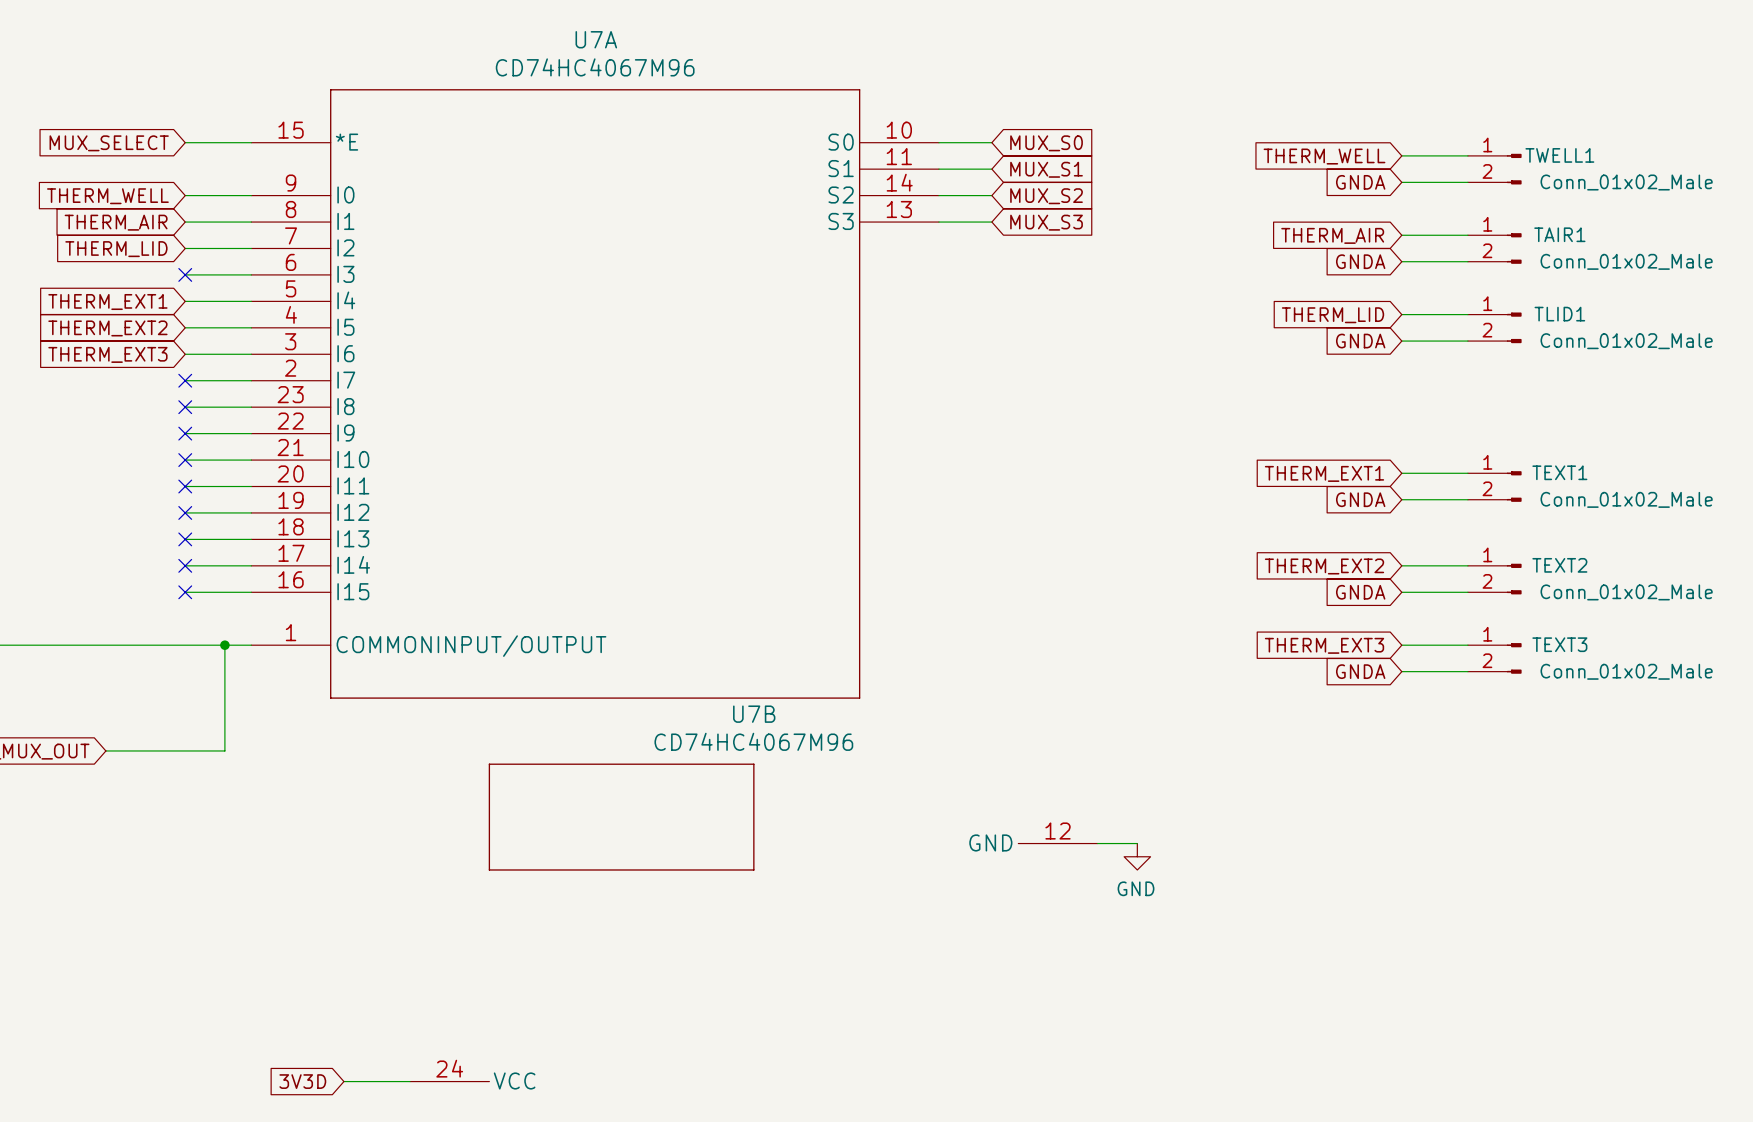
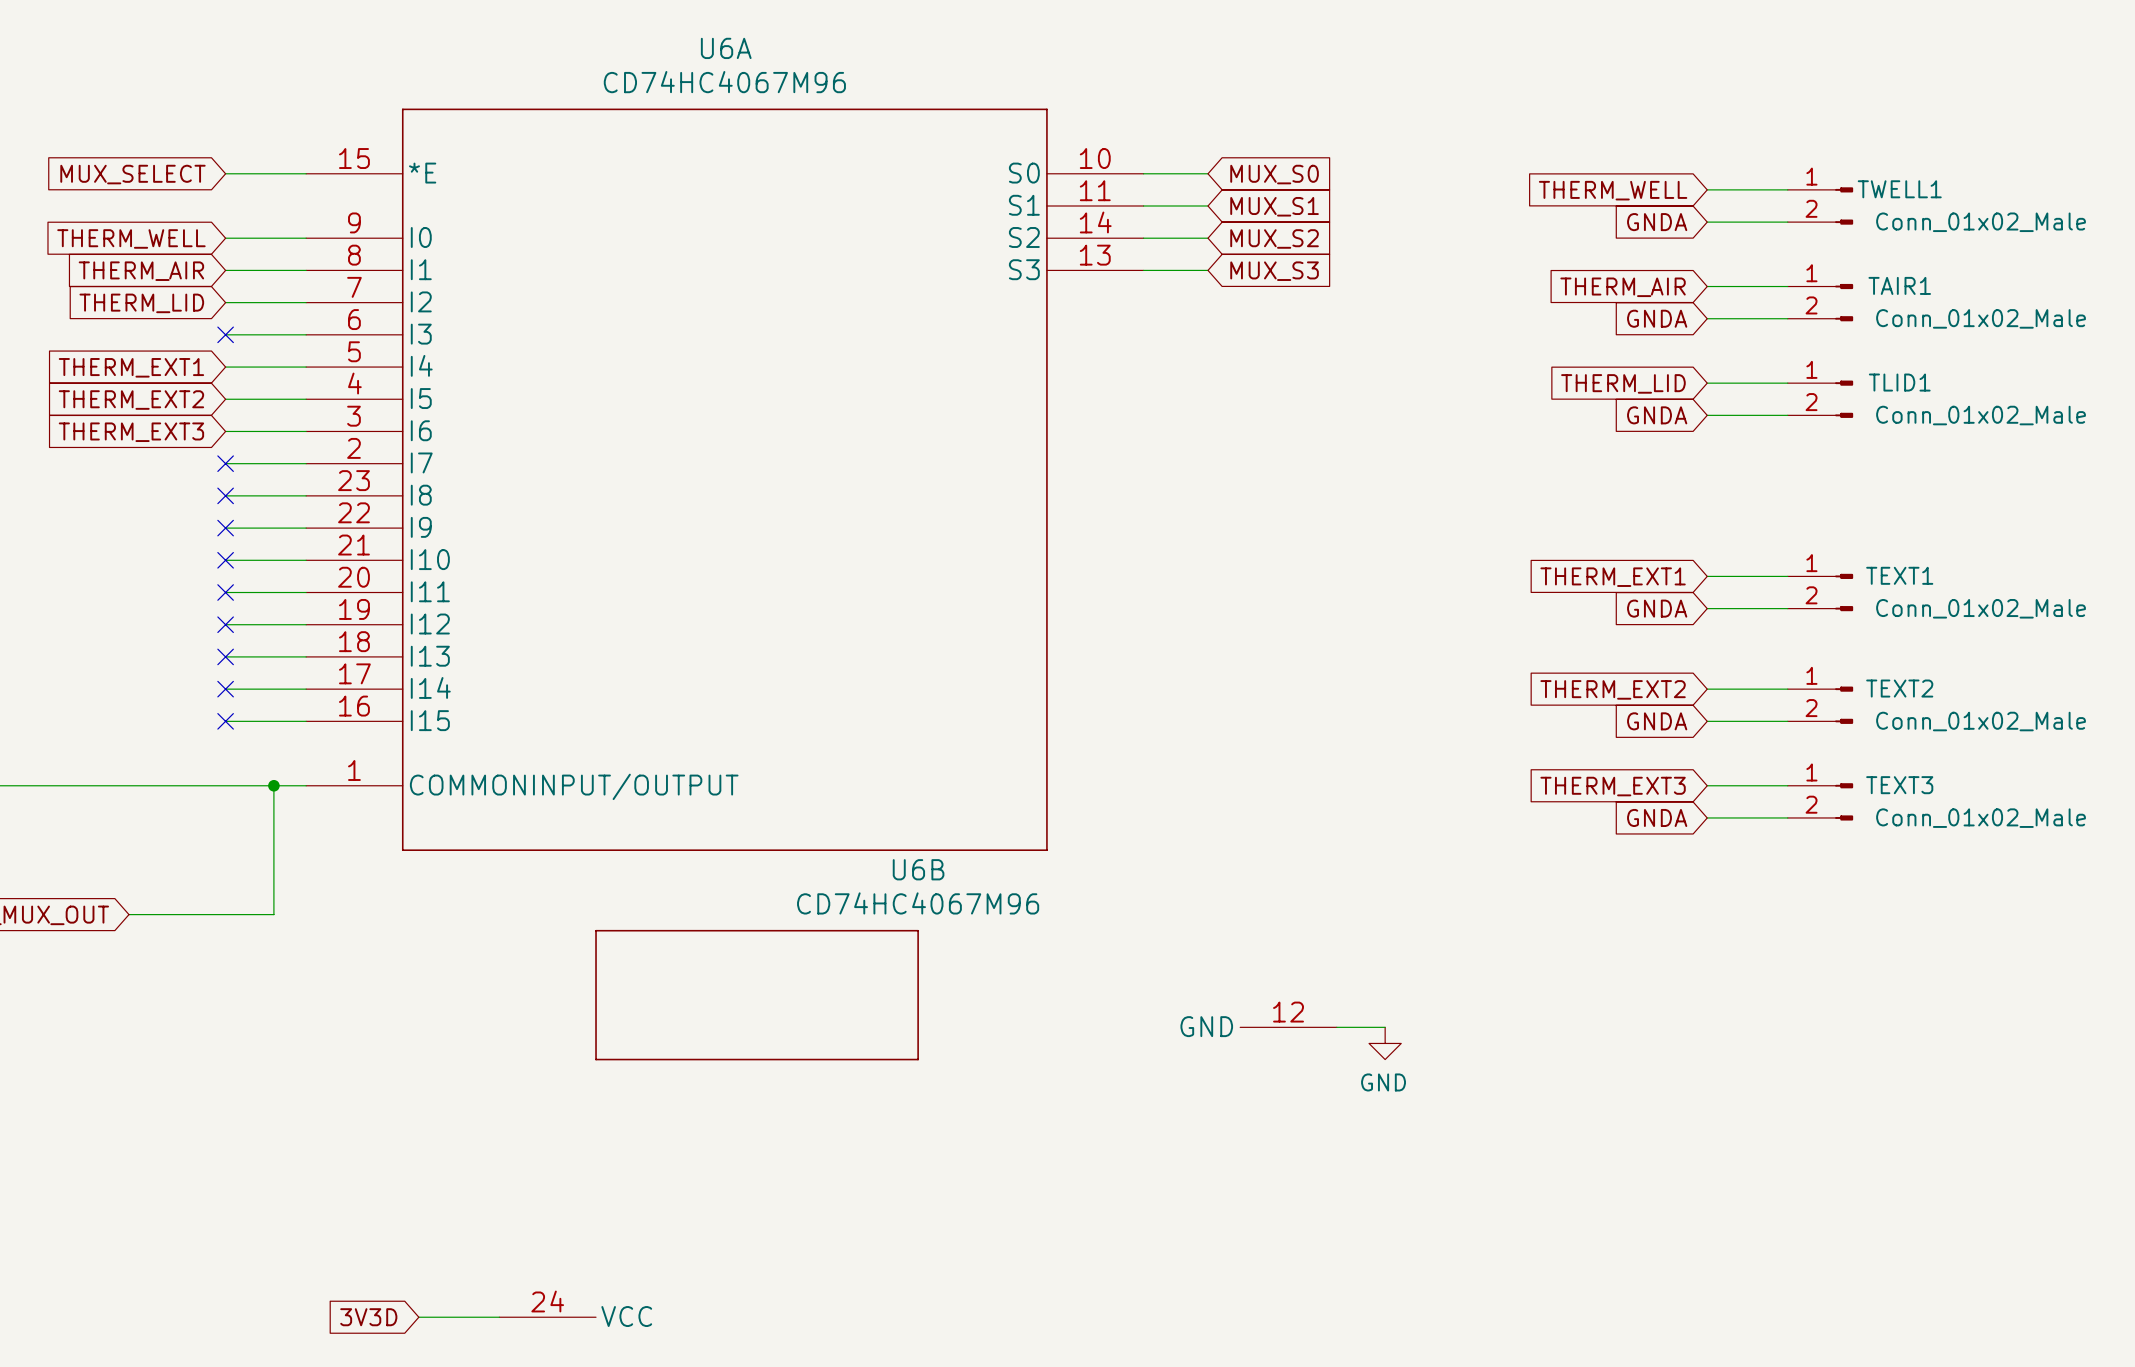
U7A name: U7A (596, 39) -> U6A (726, 48)
U7B name: U7B (754, 714) -> U6B (918, 869)

